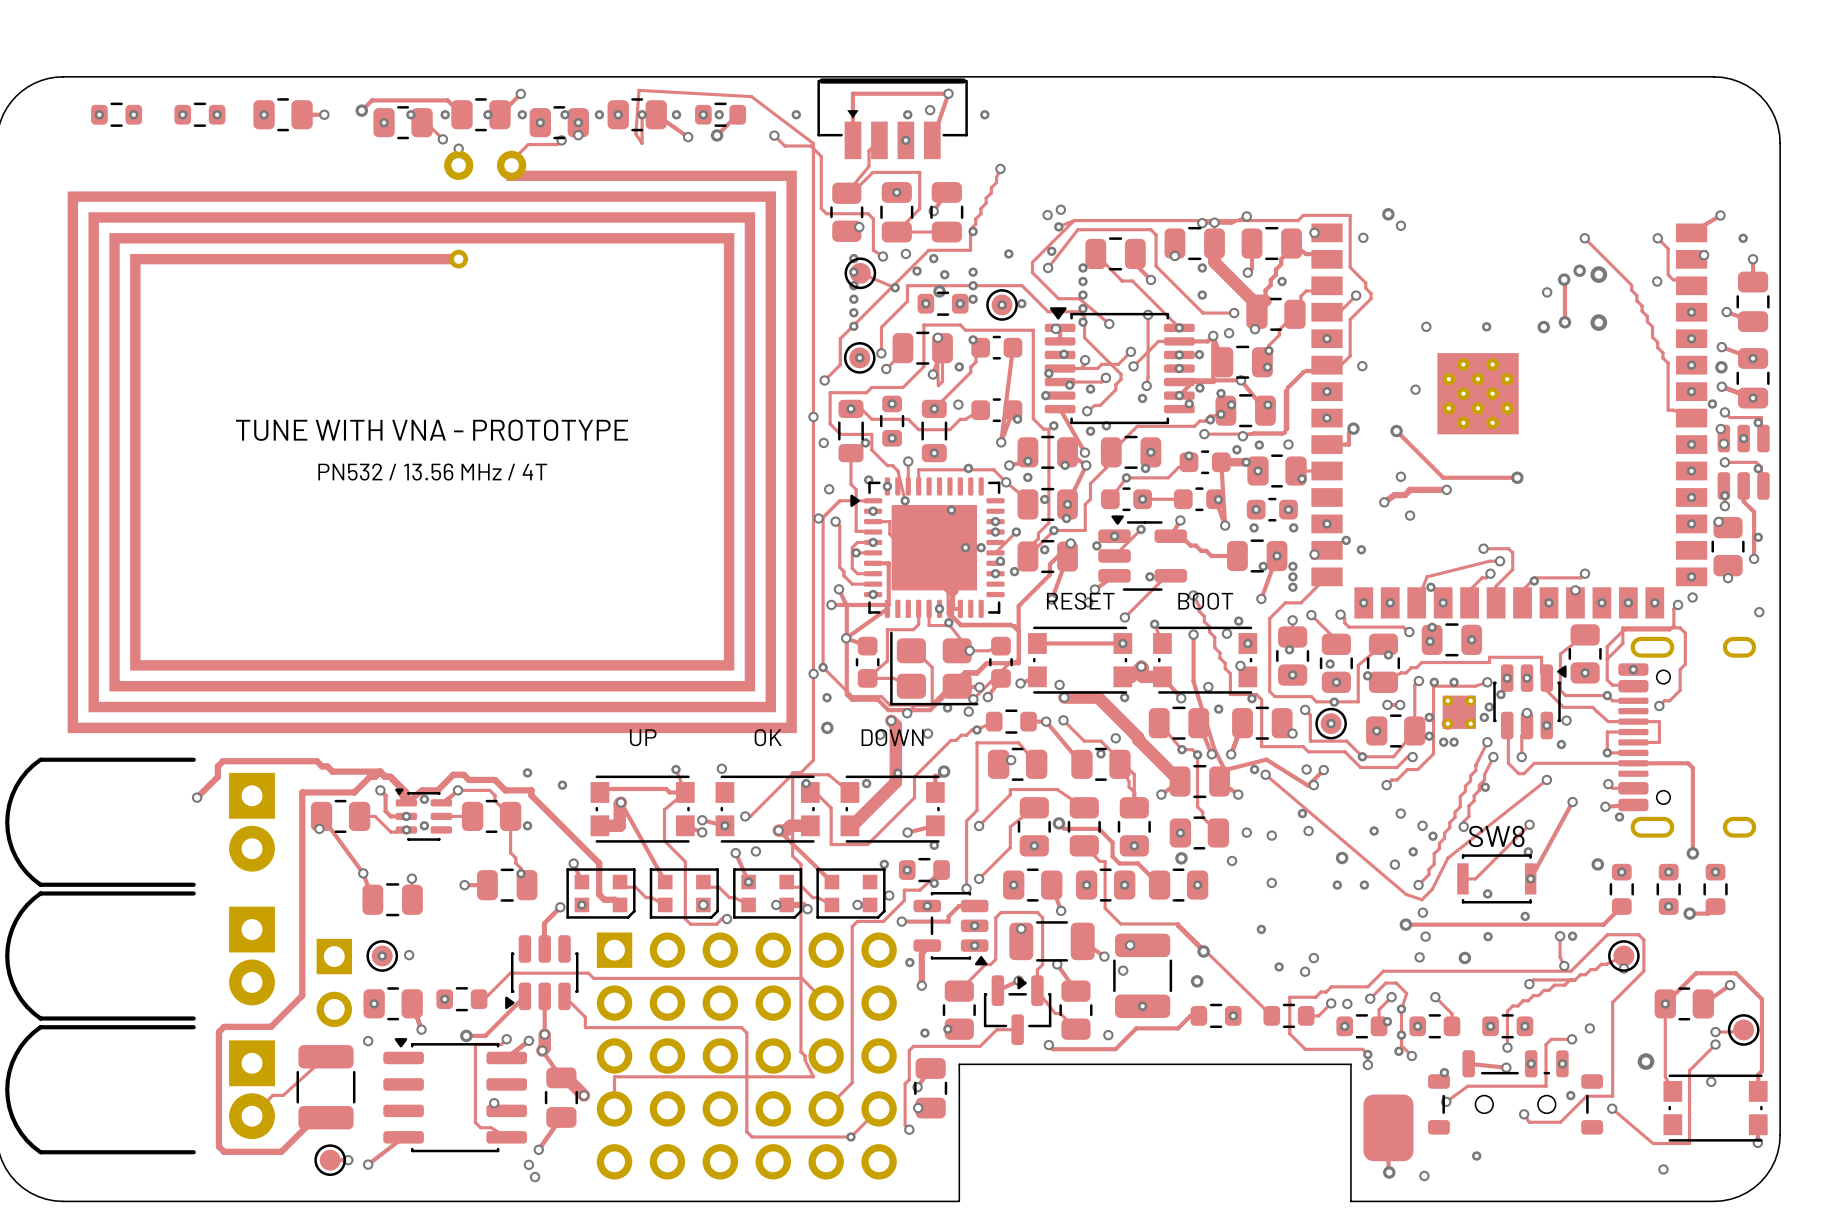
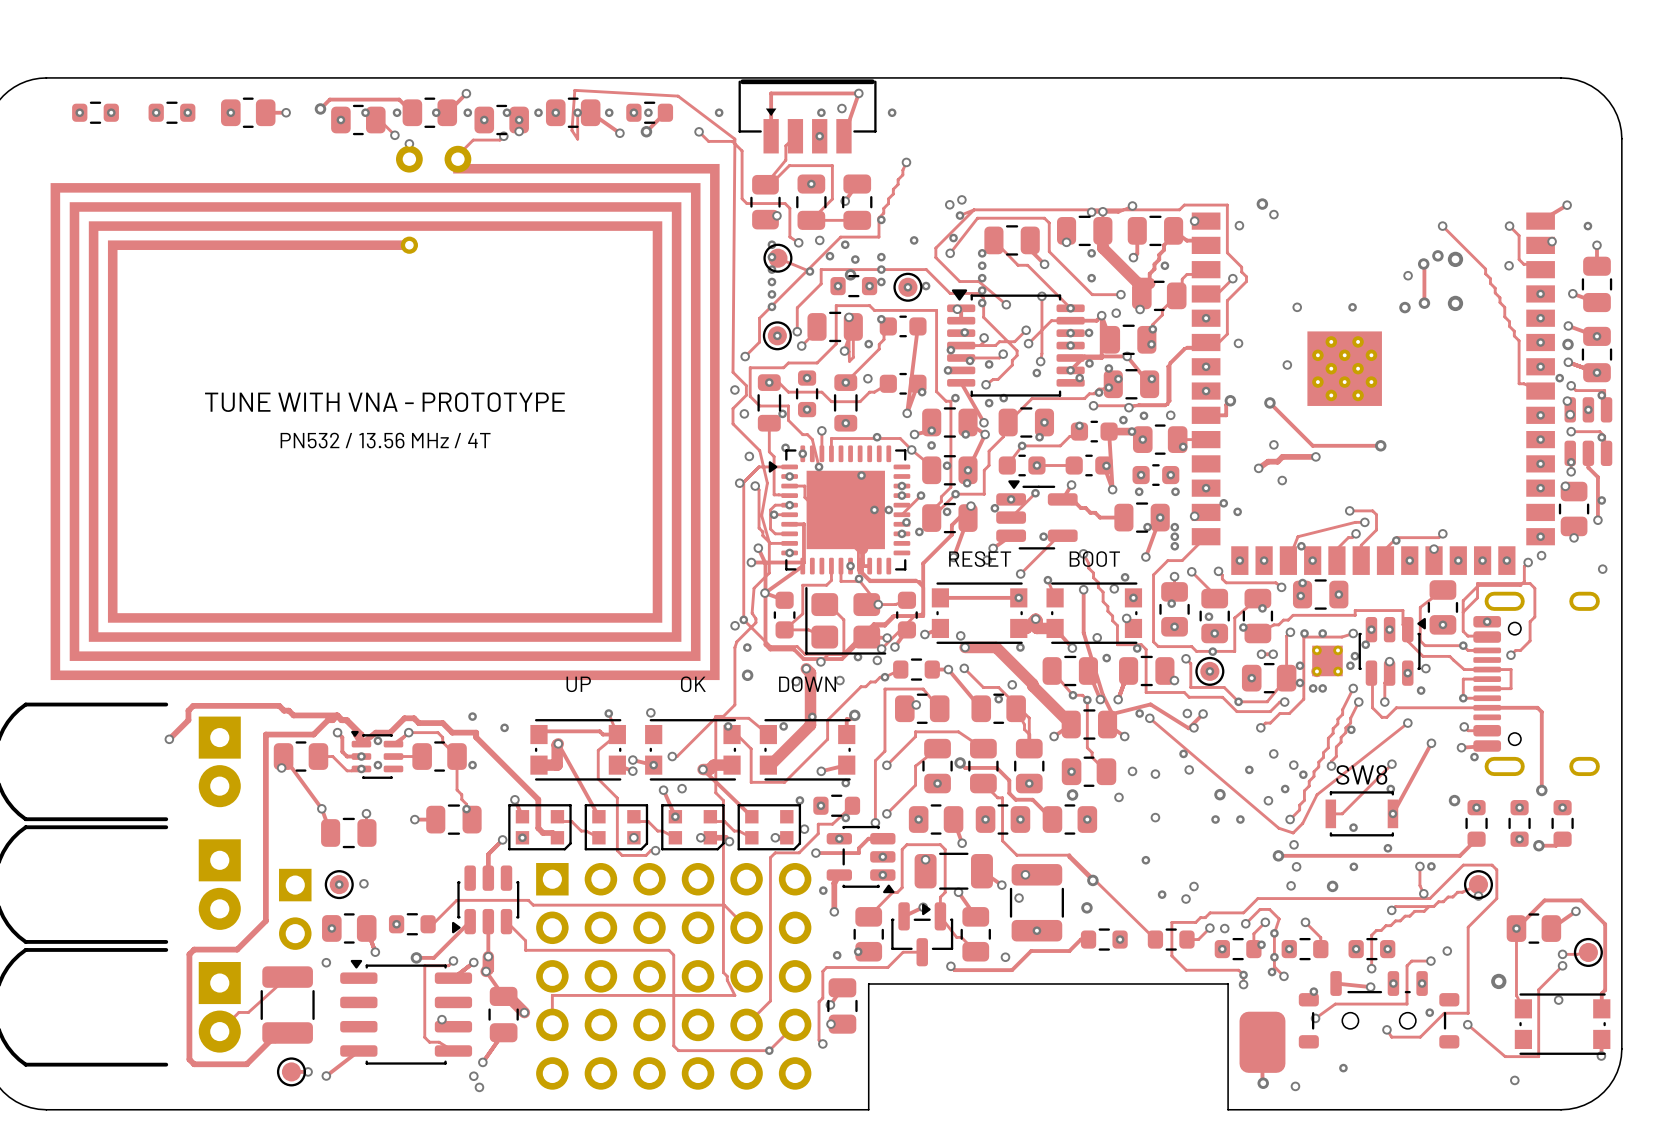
track: (813, 143) (813, 697) -> (734, 139) (733, 372) (746, 385) (746, 395) (733, 408) (733, 423) (759, 450) (767, 483) (761, 515) (769, 542) (769, 573) (754, 588) (752, 613) (755, 622) (736, 641) (734, 647)

